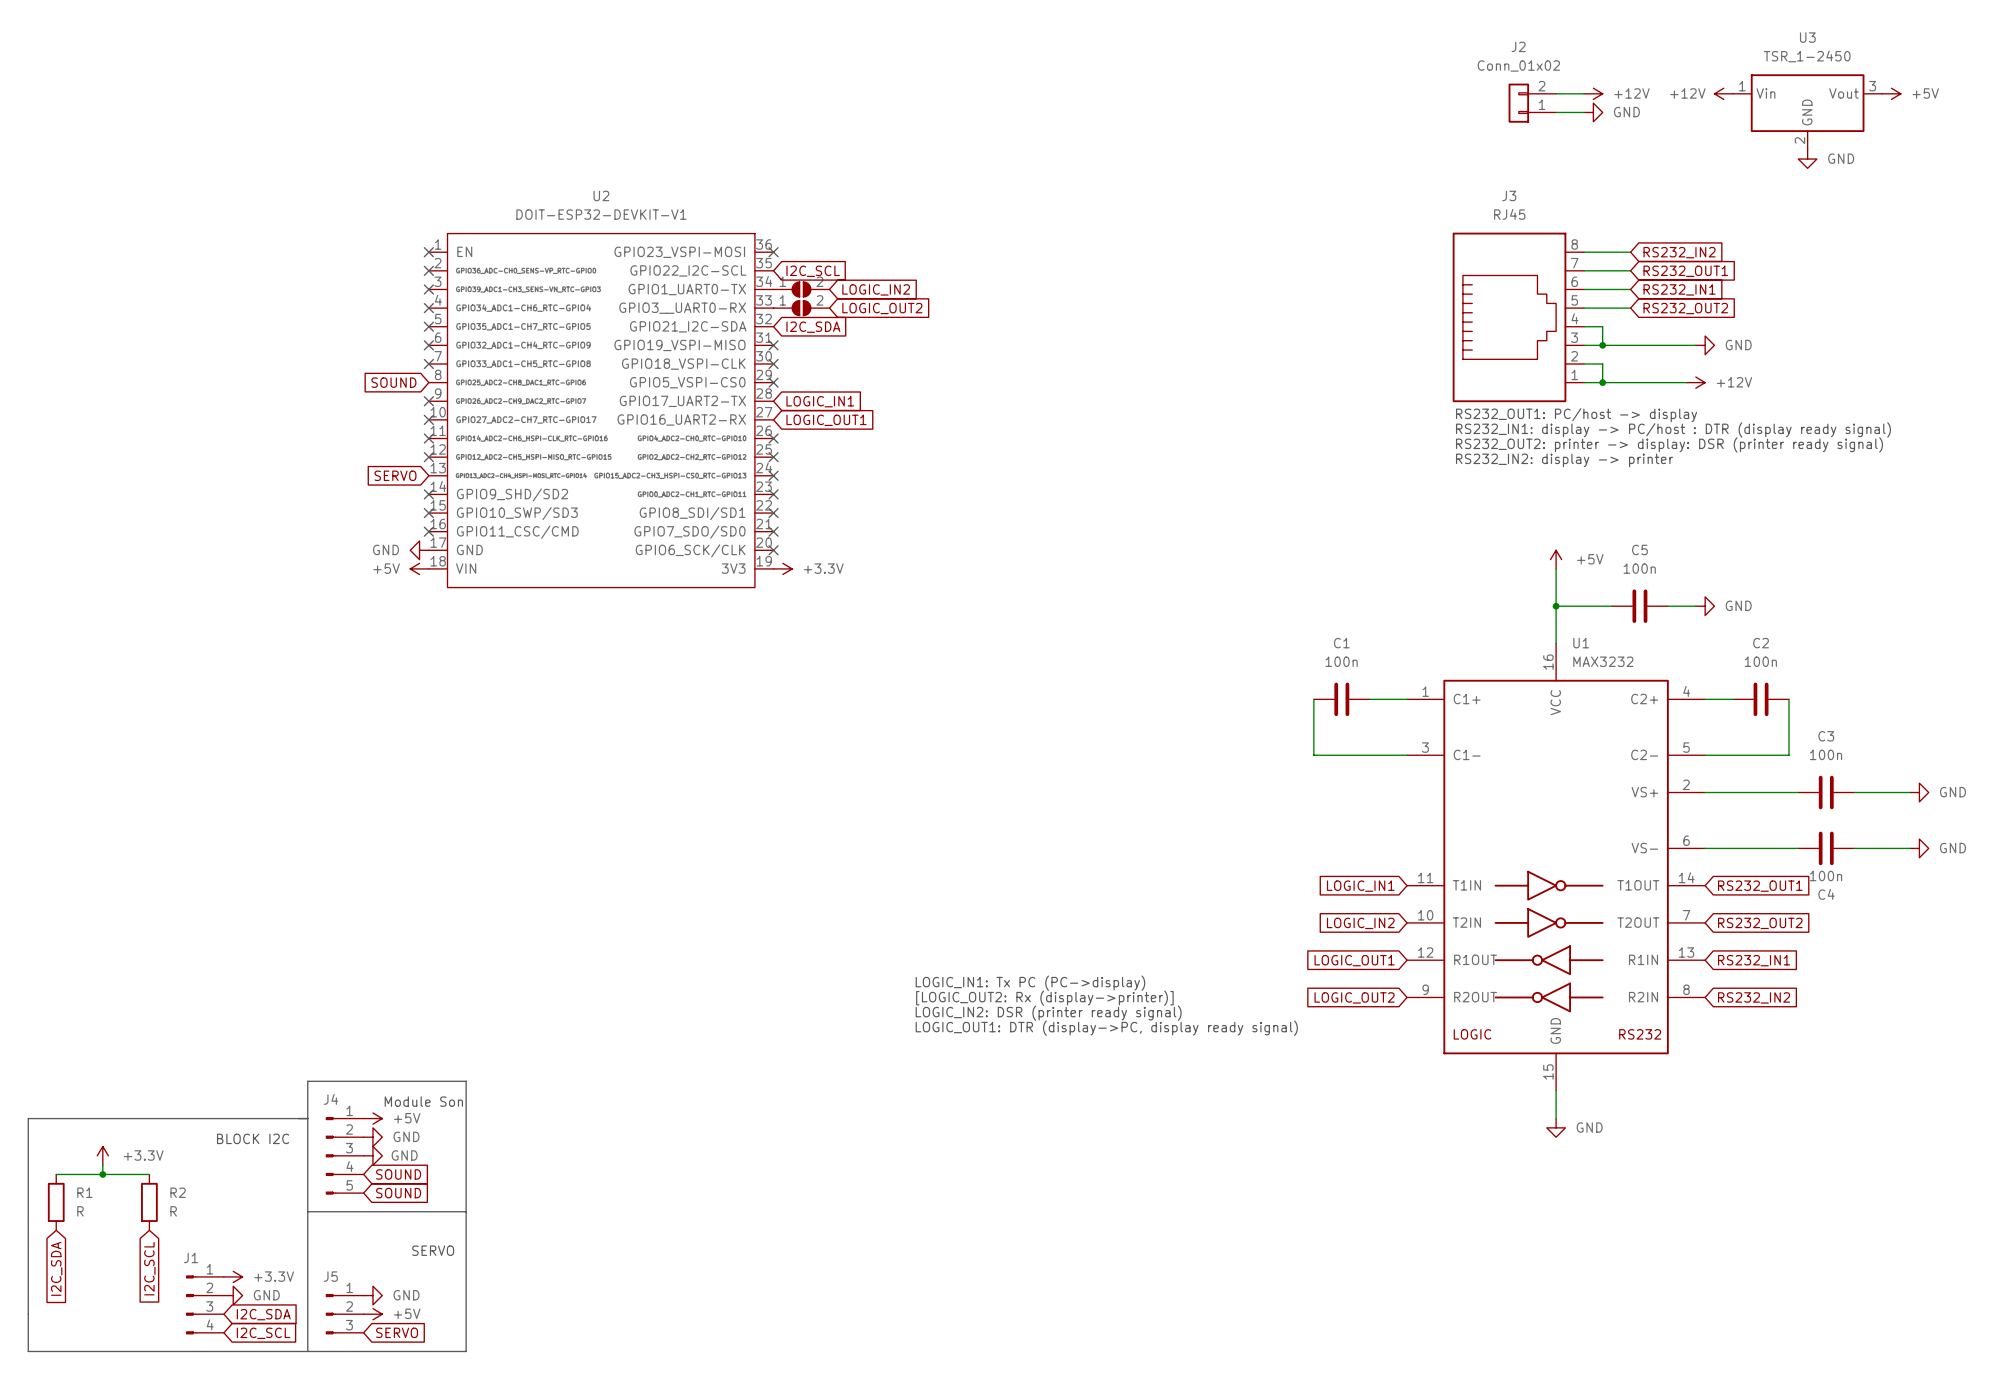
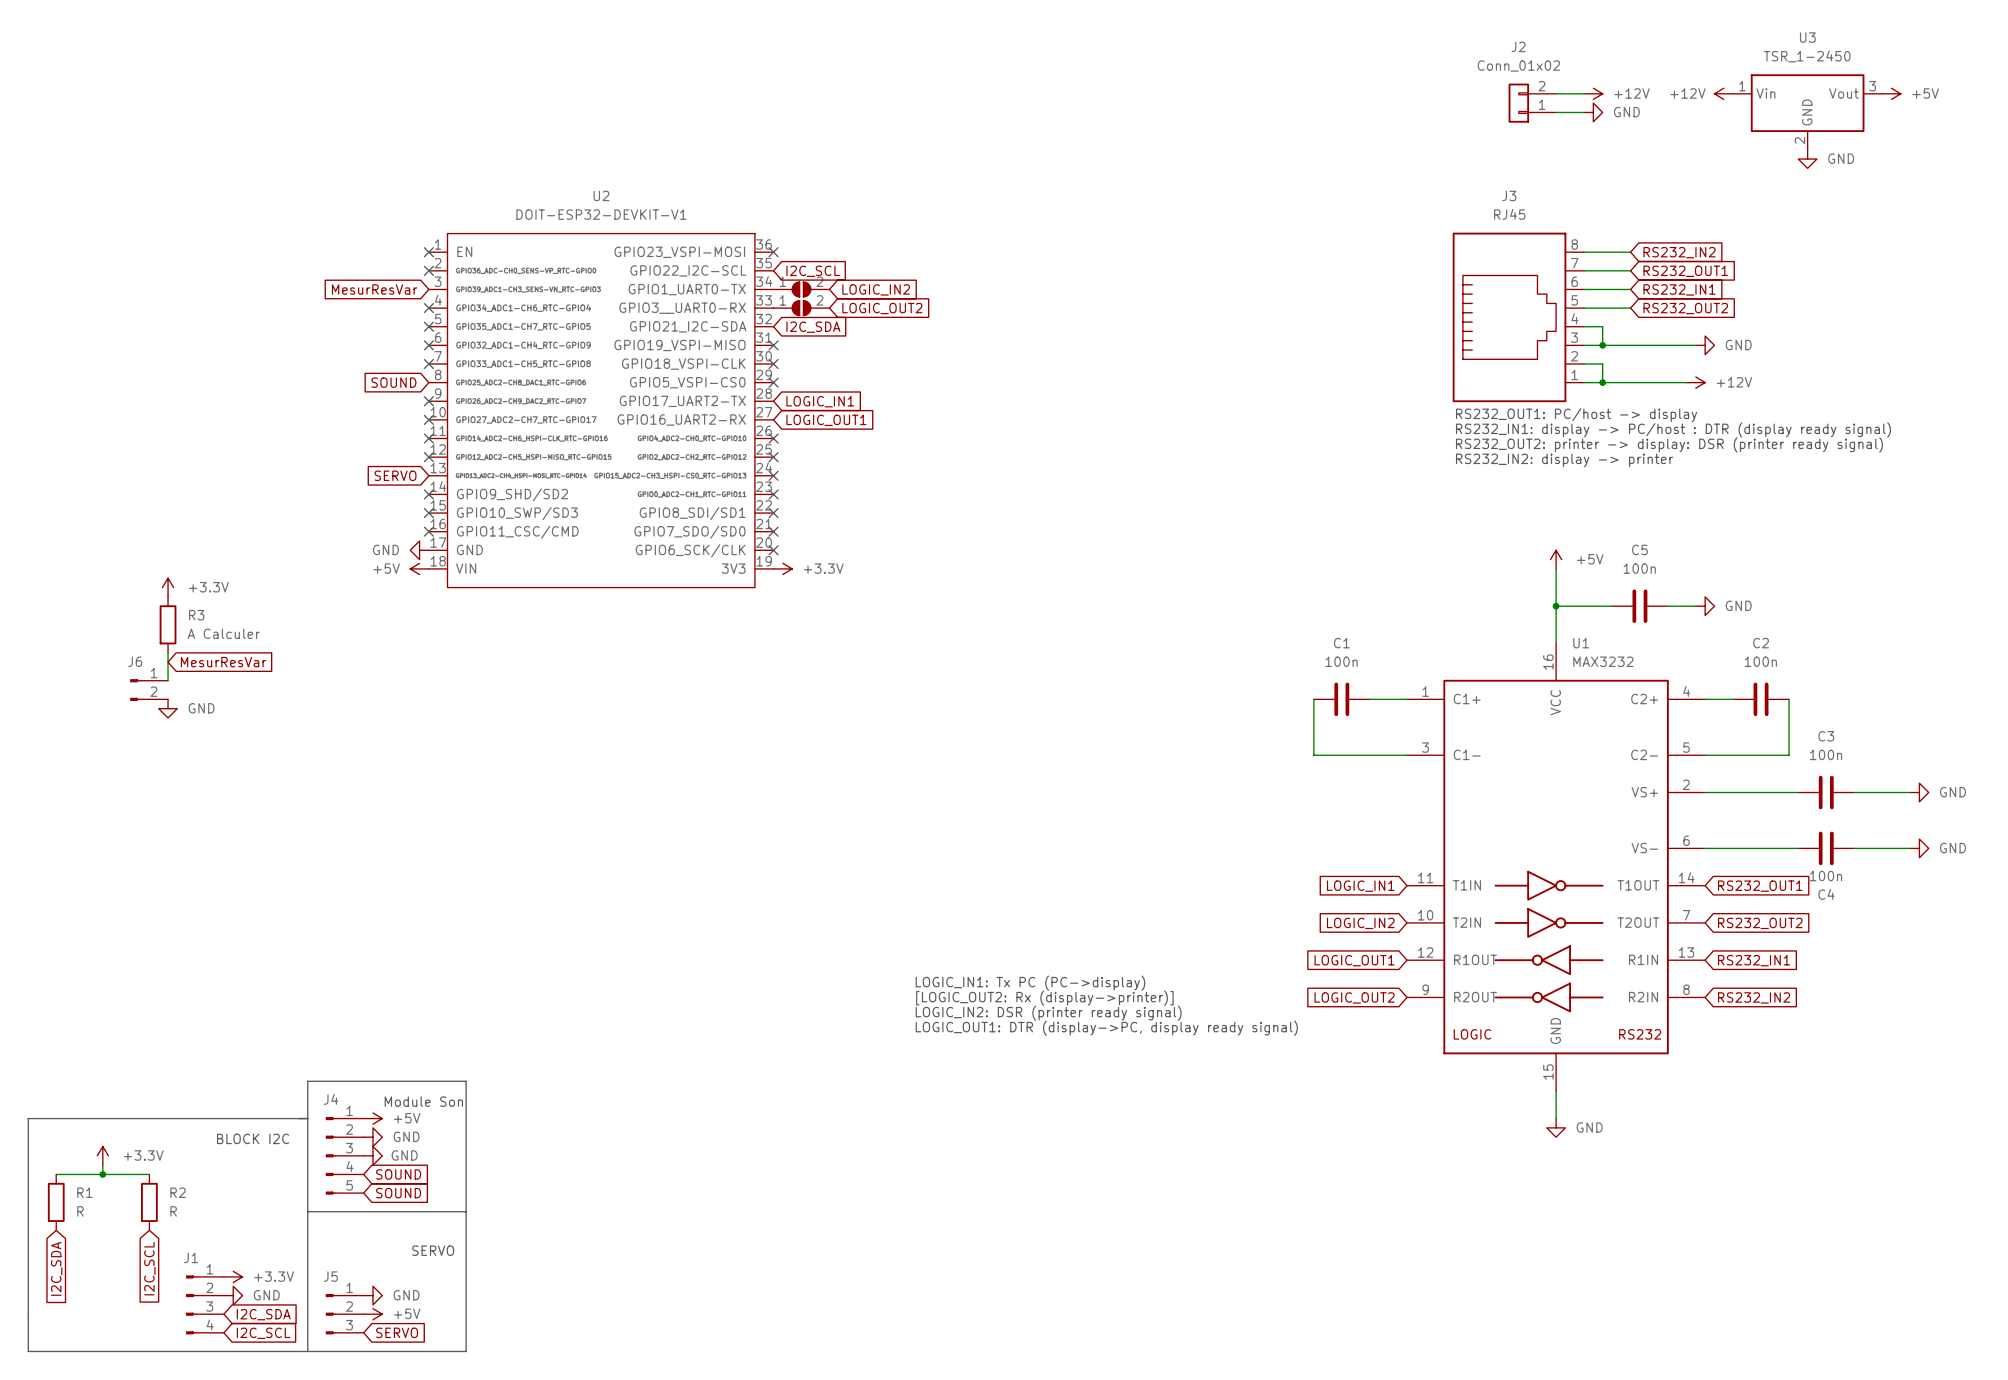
global label: none -> MesurResVar (374, 289)
no-connect mark: (428, 289) -> none
power symbol: none -> +3.3V (168, 587)
R3: none -> A Calculer (168, 624)
wire: none -> (168, 652) (168, 680)
global label: none -> MesurResVar (223, 662)
J6: none -> (149, 690)
power symbol: none -> GND (168, 708)

